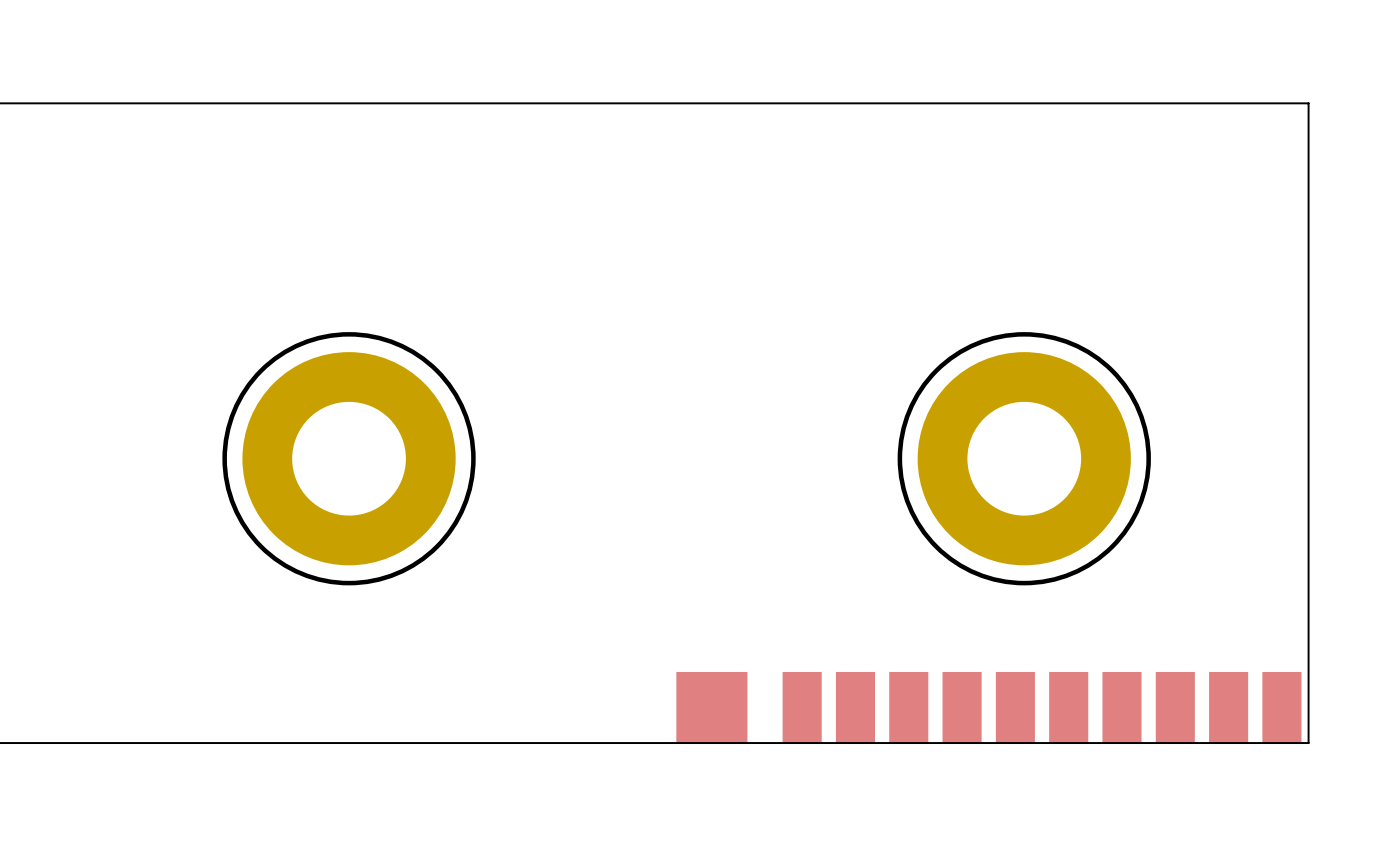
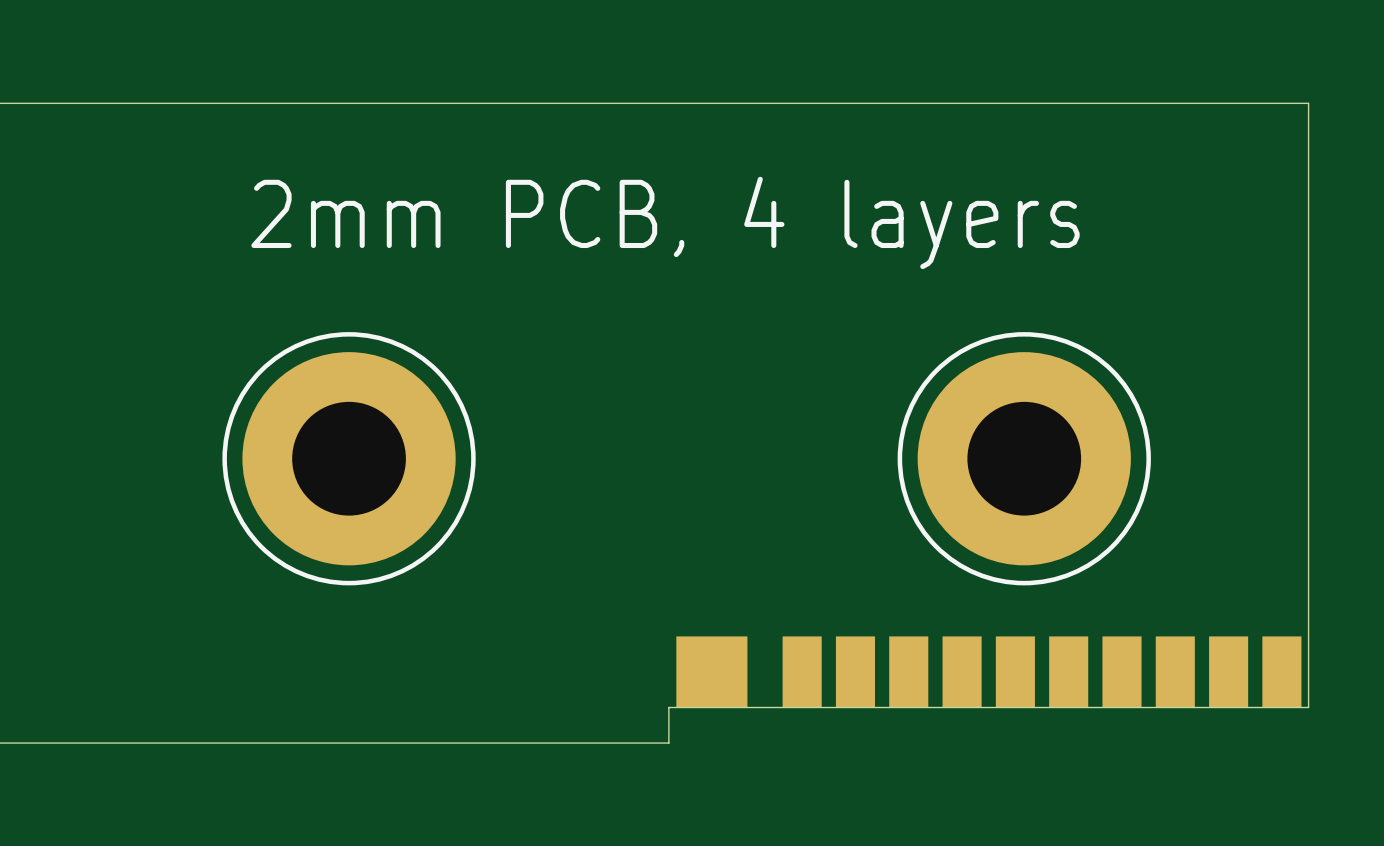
text: none -> 2mm PCB, 4 layers (665, 222)
part position: (988, 707) -> (988, 671)
board edge: (1308, 707) (1308, 743) (668, 743) -> (1308, 707) (668, 707) (668, 743)

